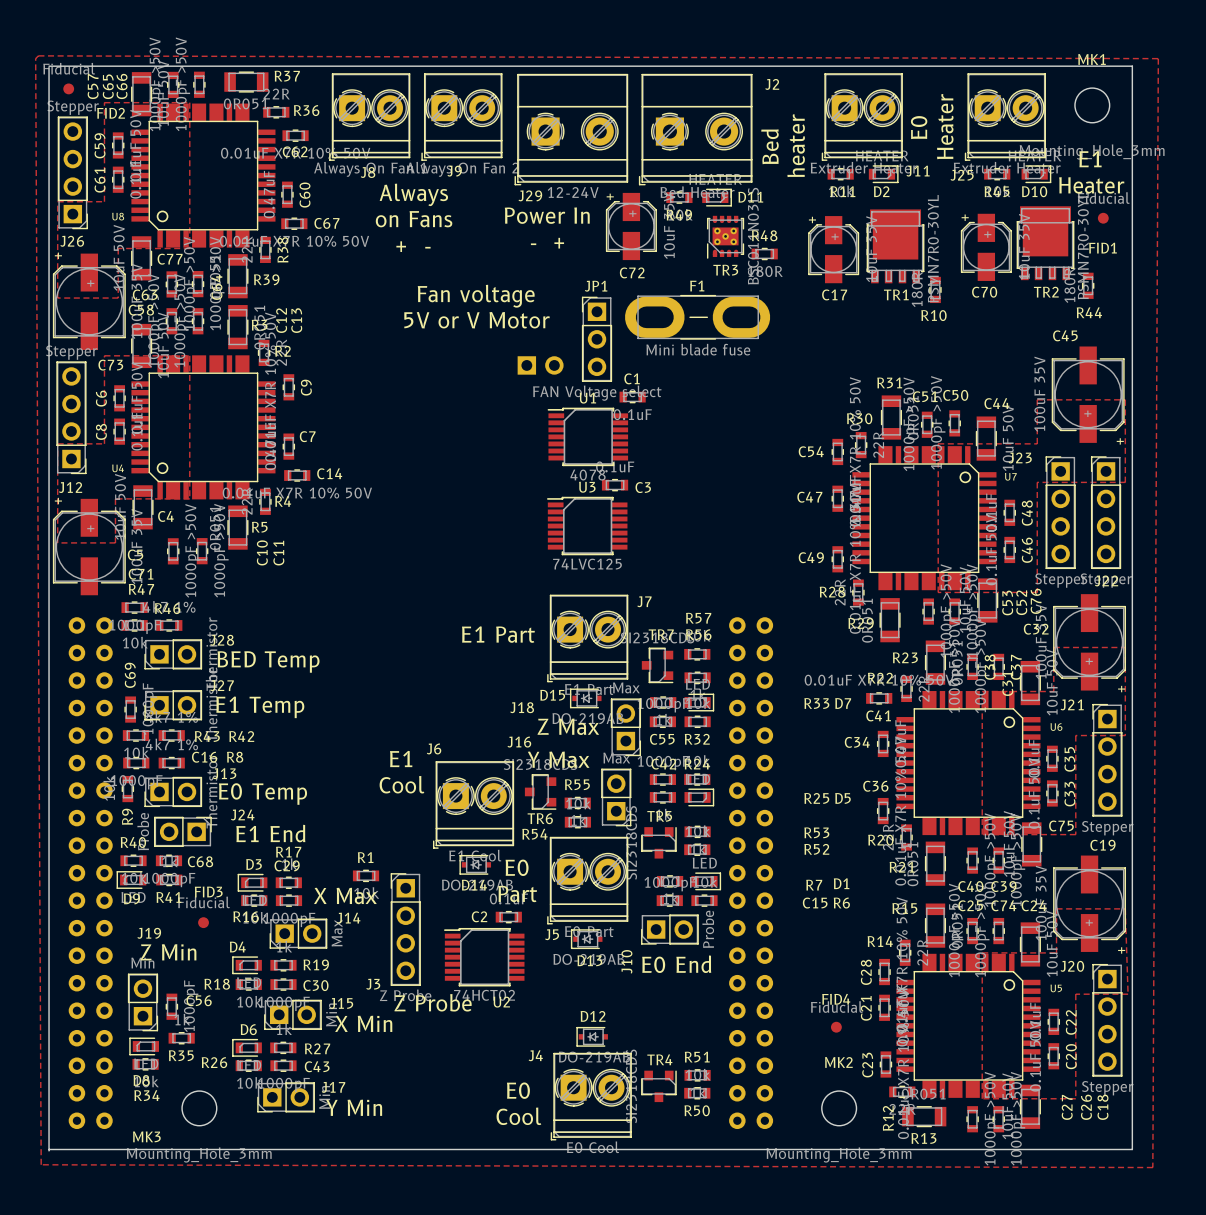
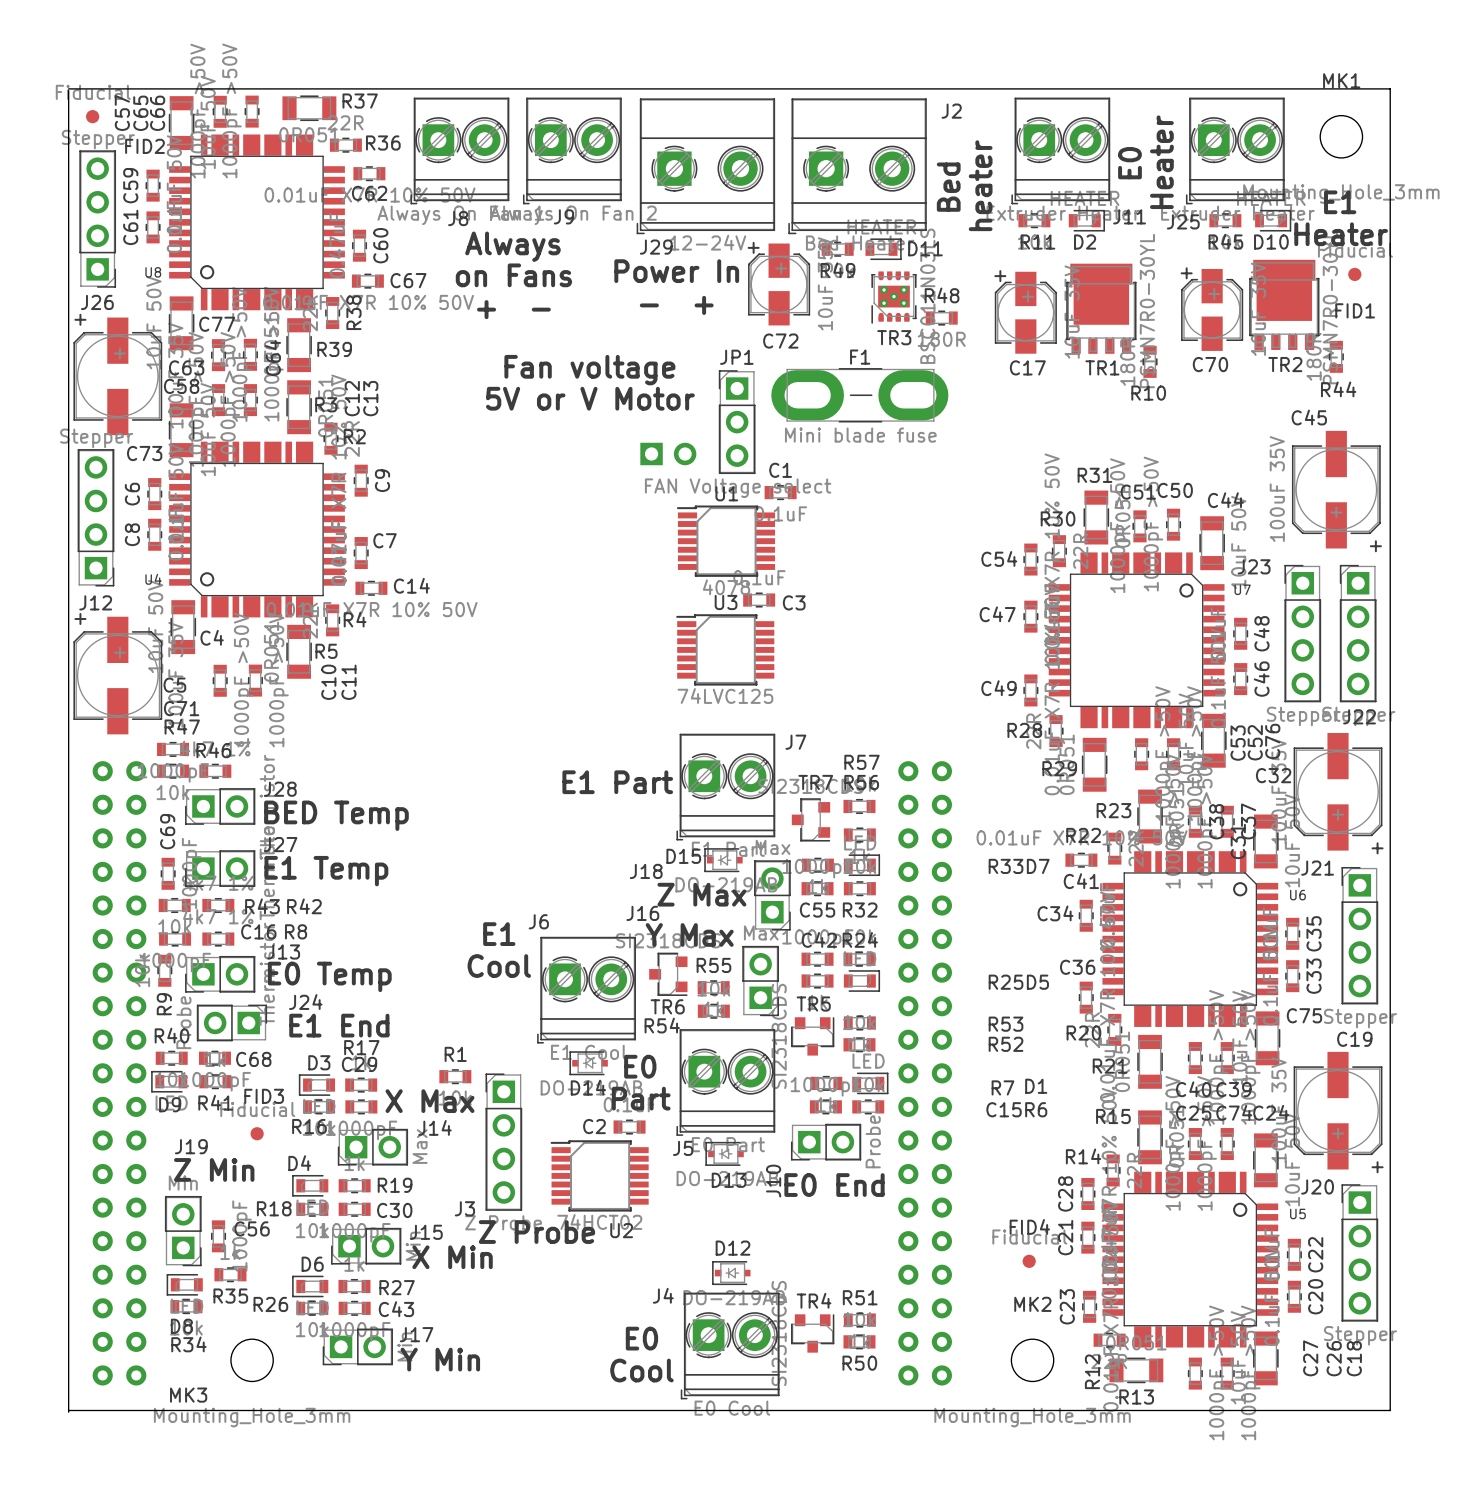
zone outline: (38, 55) (35, 58) (41, 1164) (1152, 1167) (1158, 58) (38, 55) -> none
zone outline: (104, 102) (104, 201) (57, 201) (57, 298) (118, 298) (118, 248) (189, 248) (189, 102) (104, 102) -> none
zone outline: (104, 355) (104, 443) (57, 443) (57, 542) (115, 542) (115, 498) (189, 498) (189, 355) (104, 355) -> none
zone outline: (1037, 399) (1037, 443) (938, 443) (938, 592) (1037, 592) (1037, 482) (1125, 482) (1125, 399) (1037, 399) -> none
zone outline: (1053, 647) (1053, 691) (982, 691) (982, 834) (1075, 834) (1075, 735) (1125, 735) (1125, 647) (1053, 647) -> none
zone outline: (1056, 908) (1056, 952) (982, 952) (982, 1098) (1075, 1098) (1075, 994) (1128, 994) (1125, 908) (1056, 908) -> none

